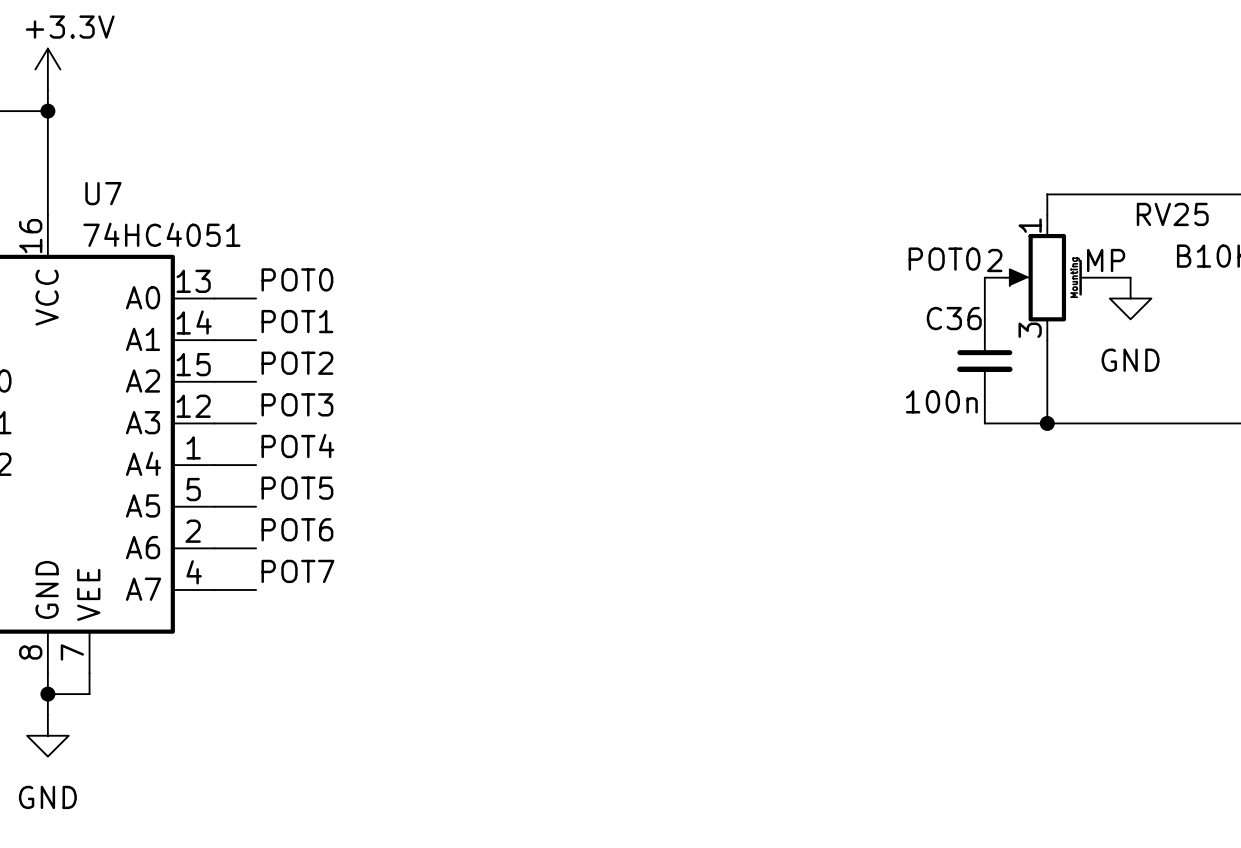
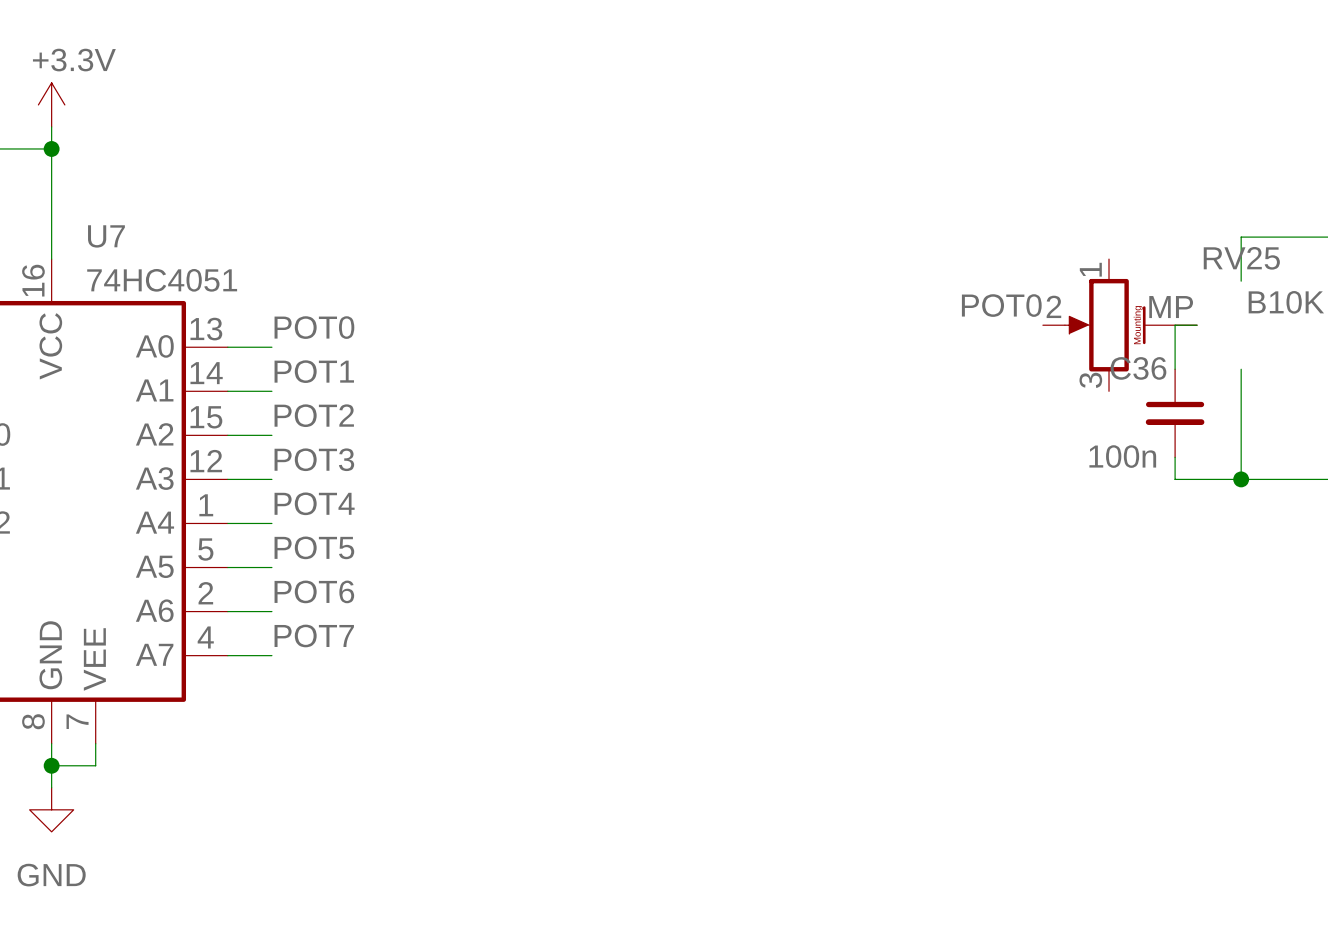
wire: (1172, 194) (1047, 194) (1047, 215) -> (1241, 237) (1241, 281)
wire: (984, 277) (984, 319) -> none
wire: none -> (1197, 325) (1175, 325) (1175, 369)
power symbol: GND (1130, 298) -> none
wire: none -> (1241, 369) (1241, 479)
wire: (1047, 340) (1047, 423) -> none
C36 position: (984, 360) -> (1175, 413)
wire: (984, 402) (984, 423) (1109, 423) -> (1175, 457) (1175, 479)
junction: (1047, 423) -> none
junction: none -> (1241, 479)

